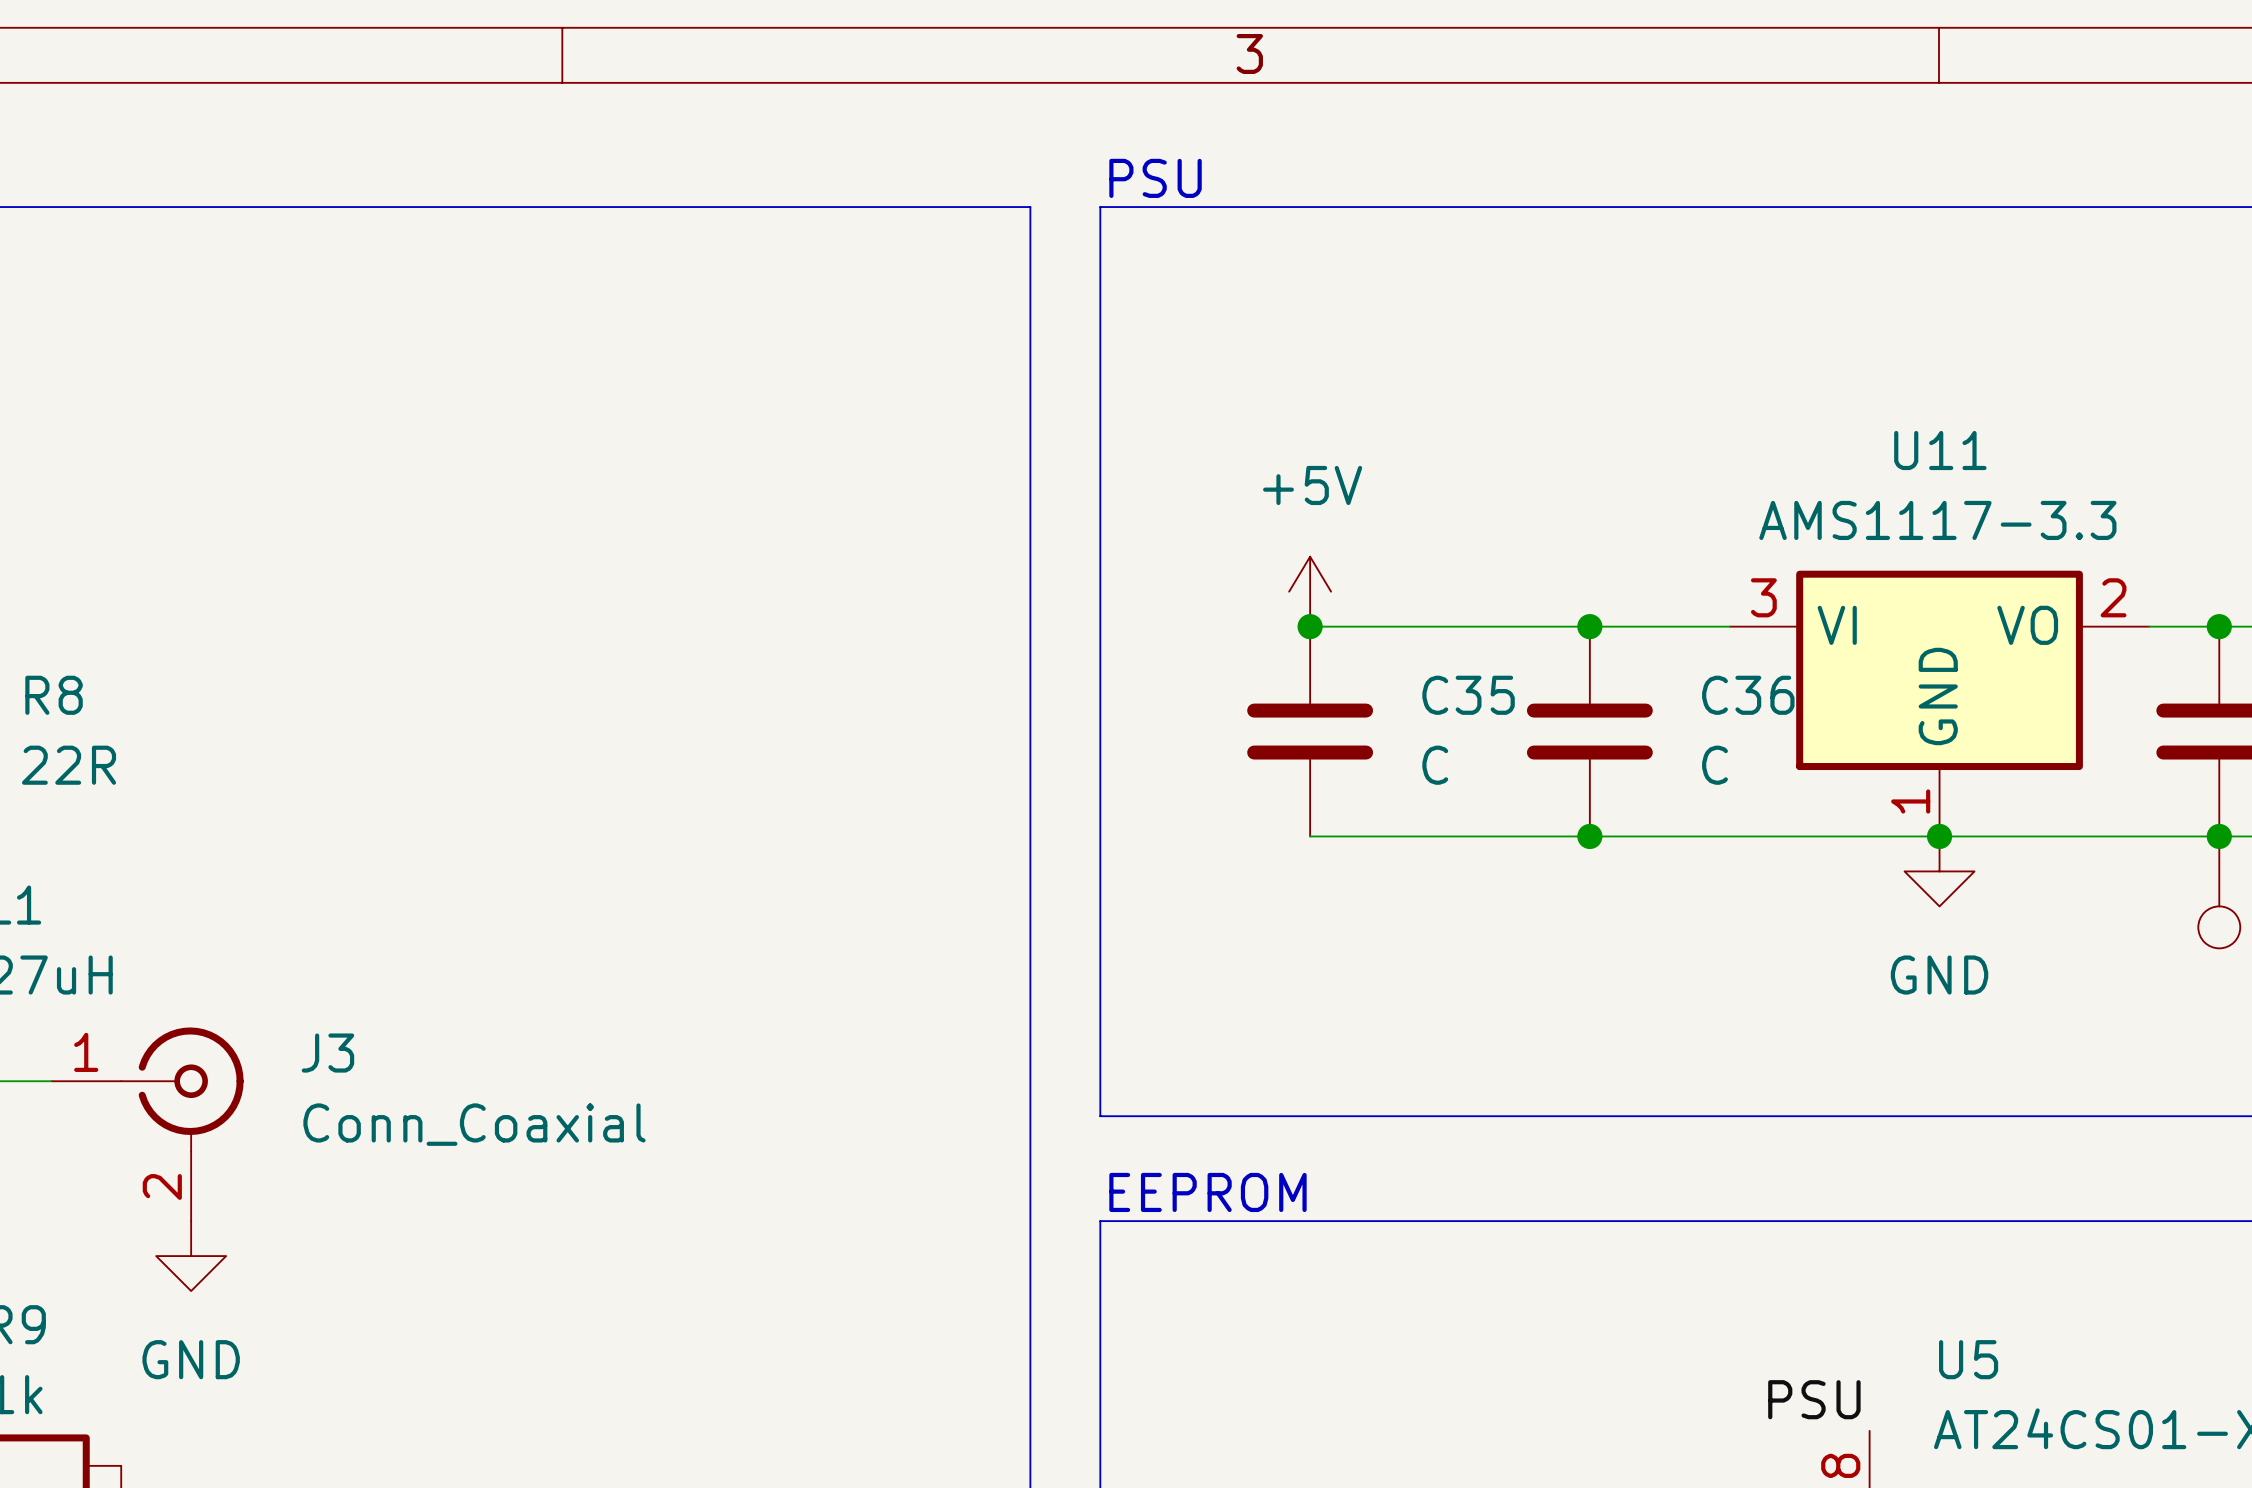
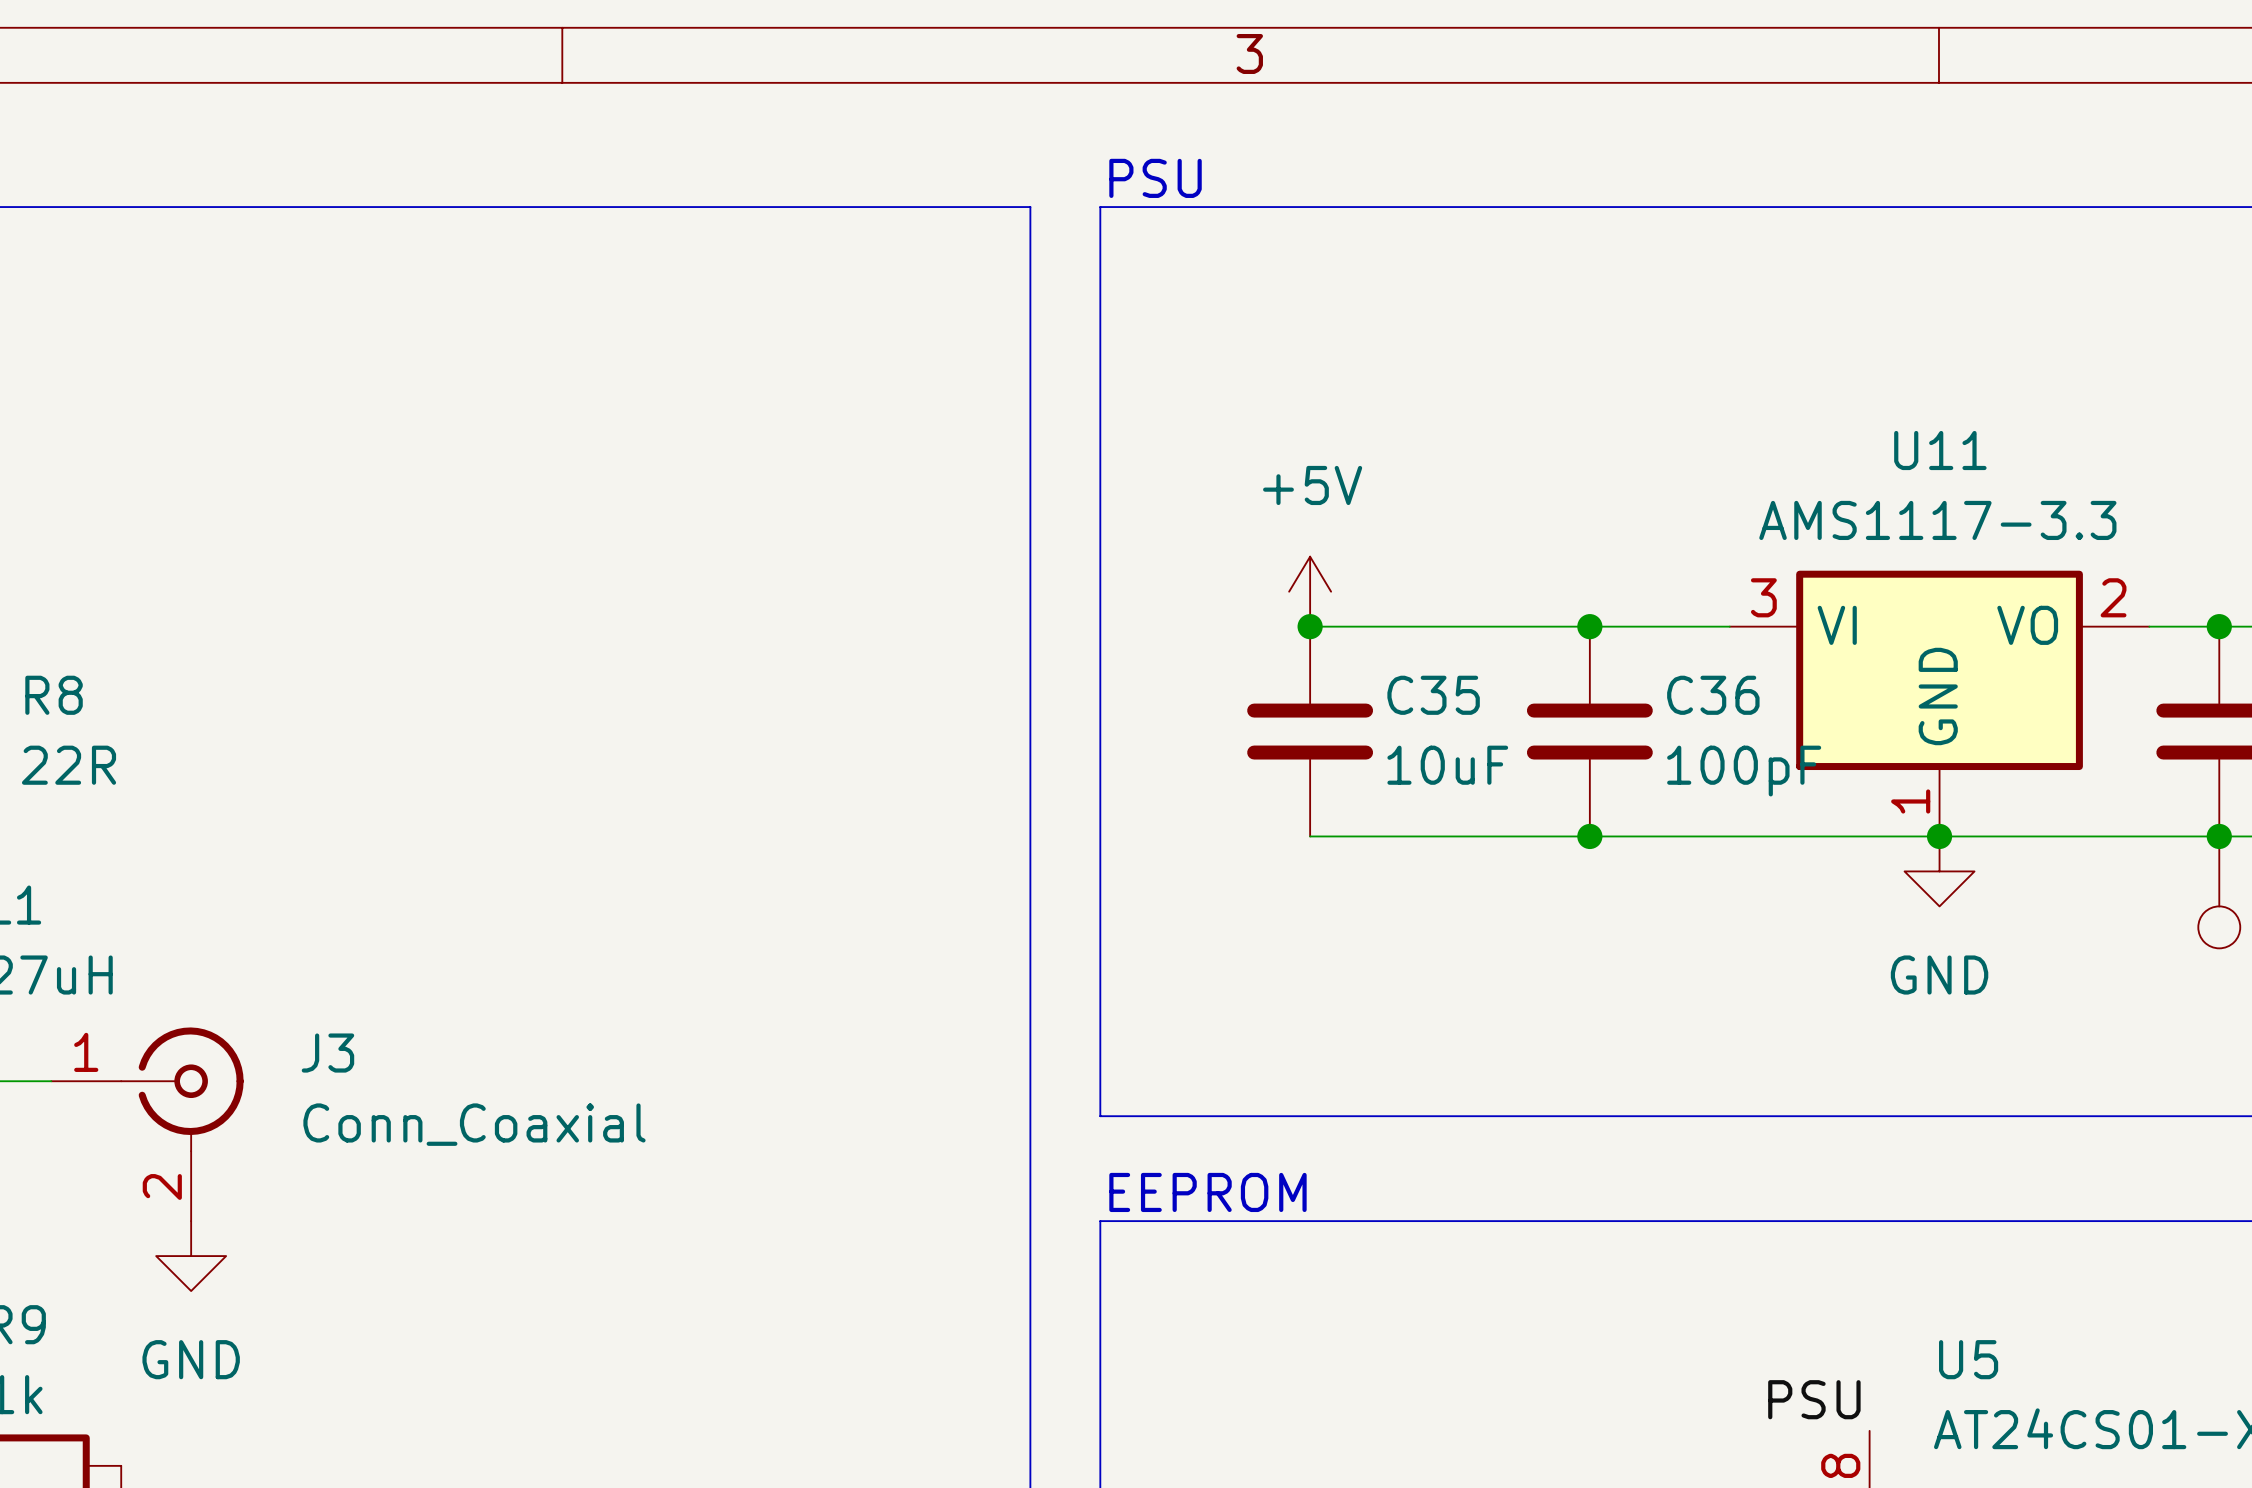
C35 name position: C35 (1468, 695) -> C35 (1433, 695)
C36 name position: C36 (1748, 695) -> C36 (1713, 695)
C35 value: C (1435, 765) -> 10uF (1447, 765)
C36 value: C (1715, 765) -> 100pF (1744, 771)

